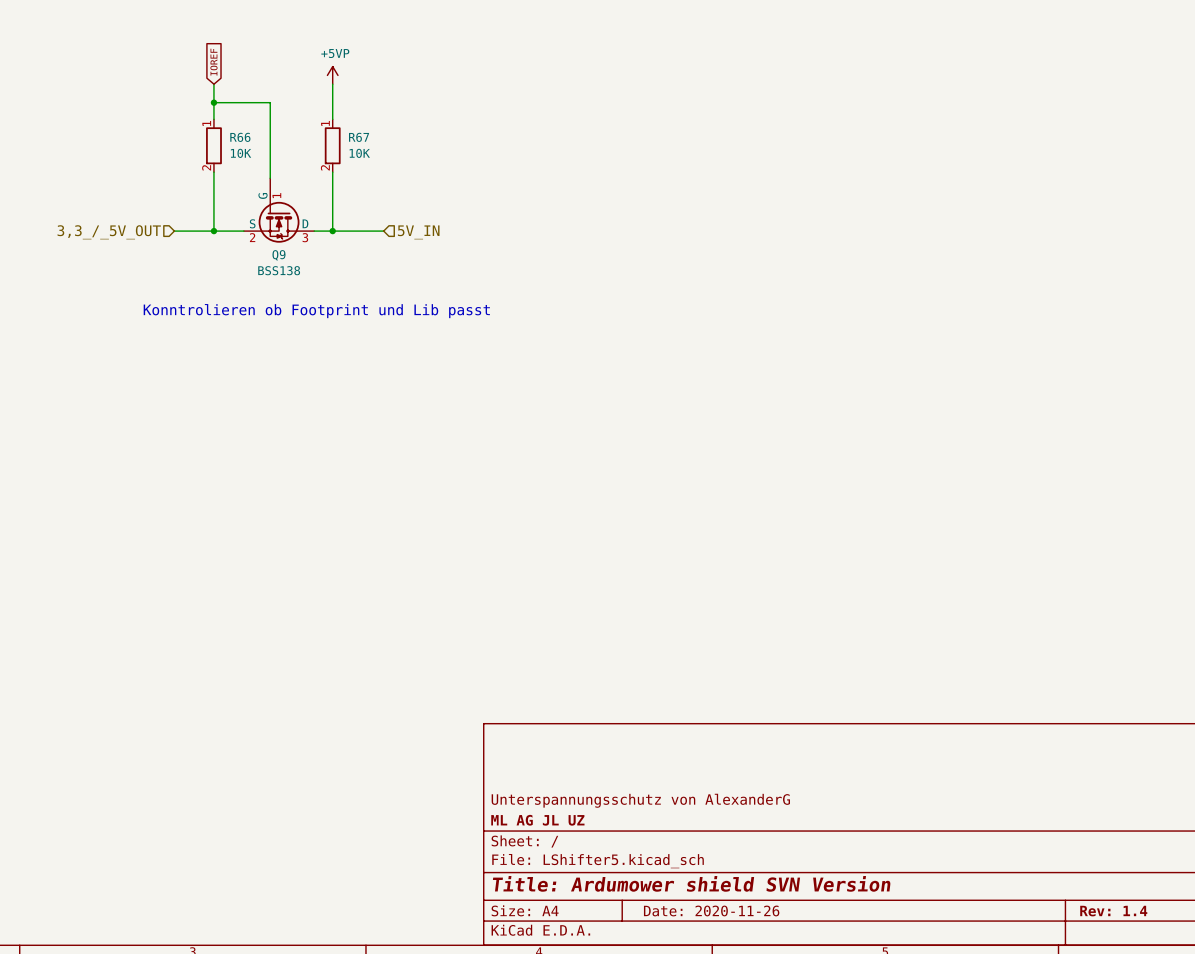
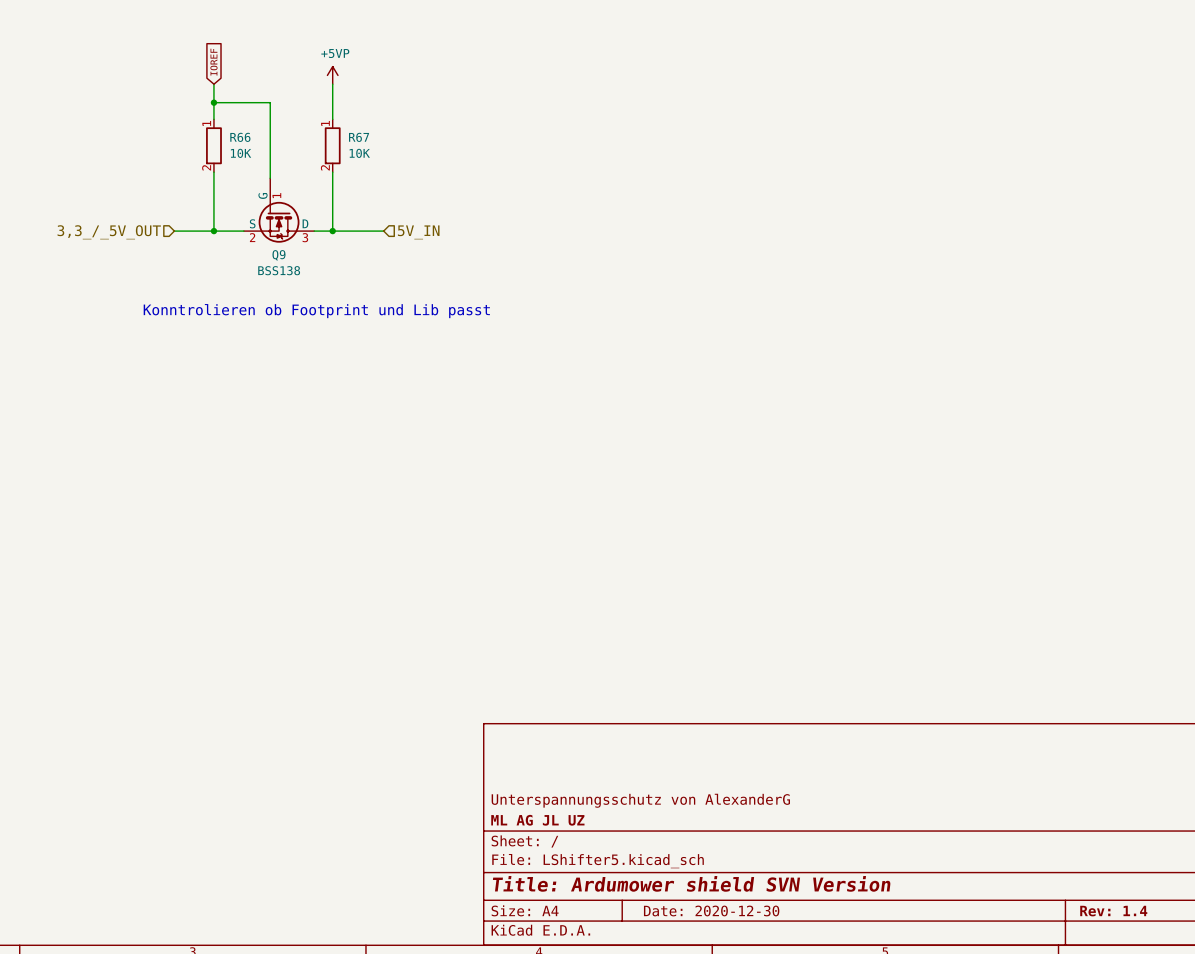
title block: Date: 2020-11-26 (711, 910) -> Date: 2020-12-30 (711, 910)

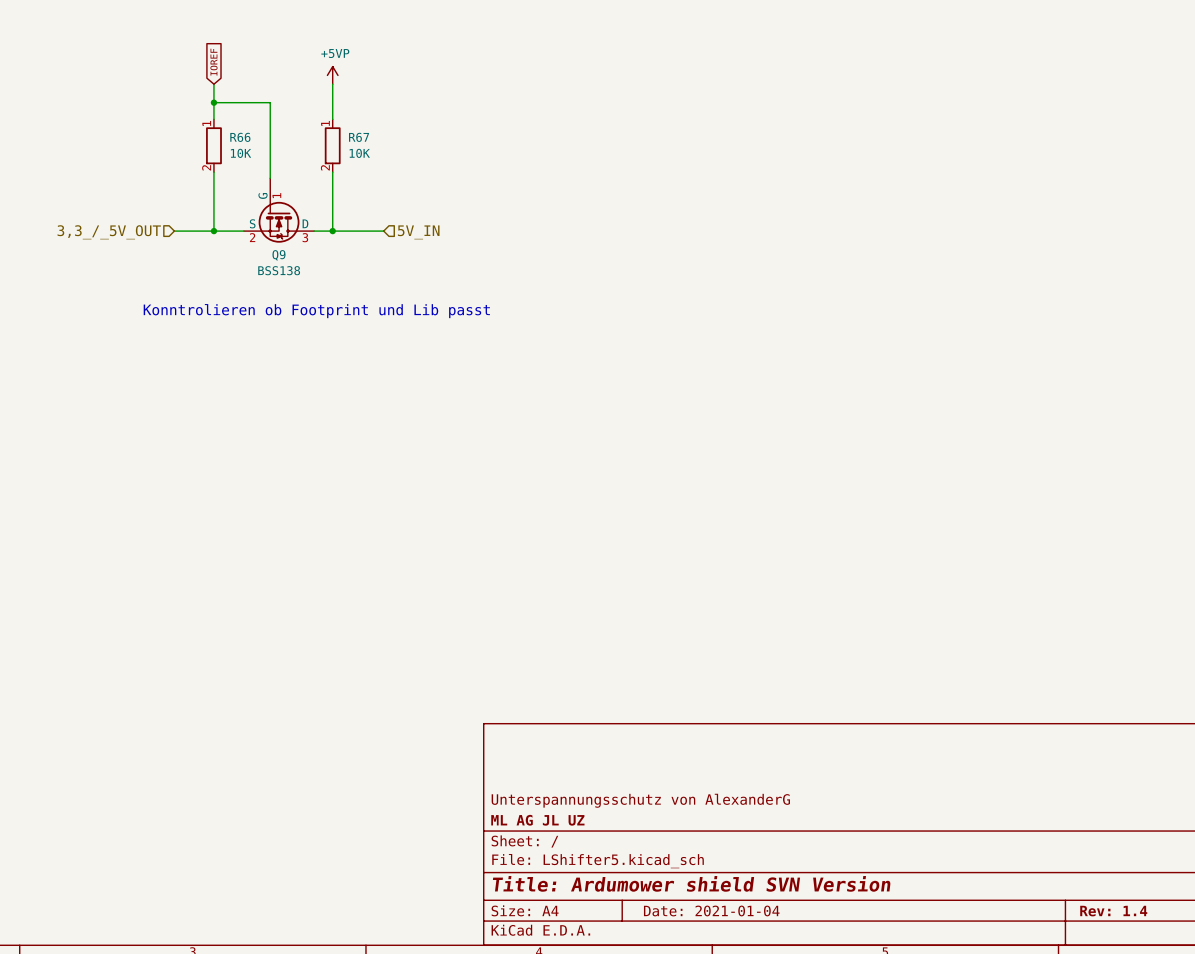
title block: Date: 2020-12-30 (711, 910) -> Date: 2021-01-04 (711, 910)

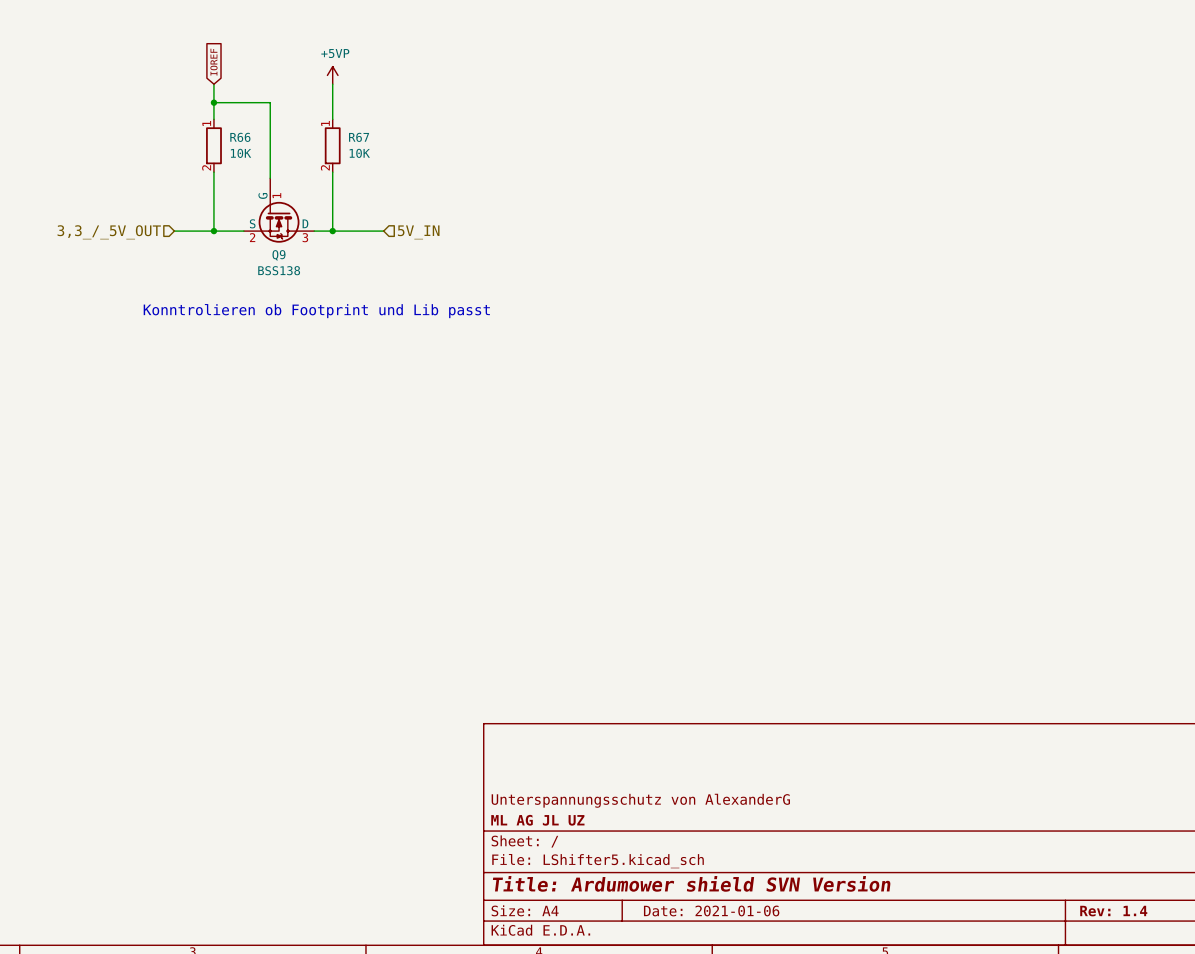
title block: Date: 2021-01-04 (711, 910) -> Date: 2021-01-06 (711, 910)

